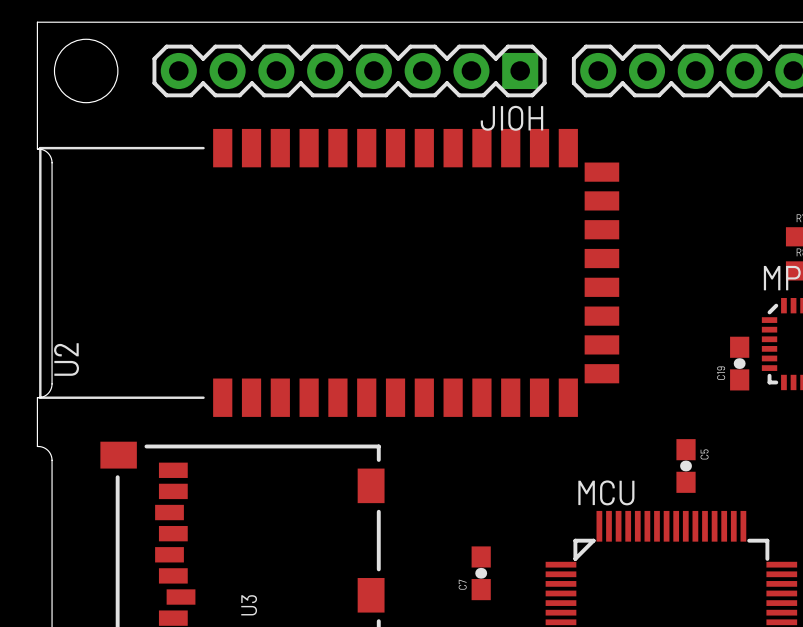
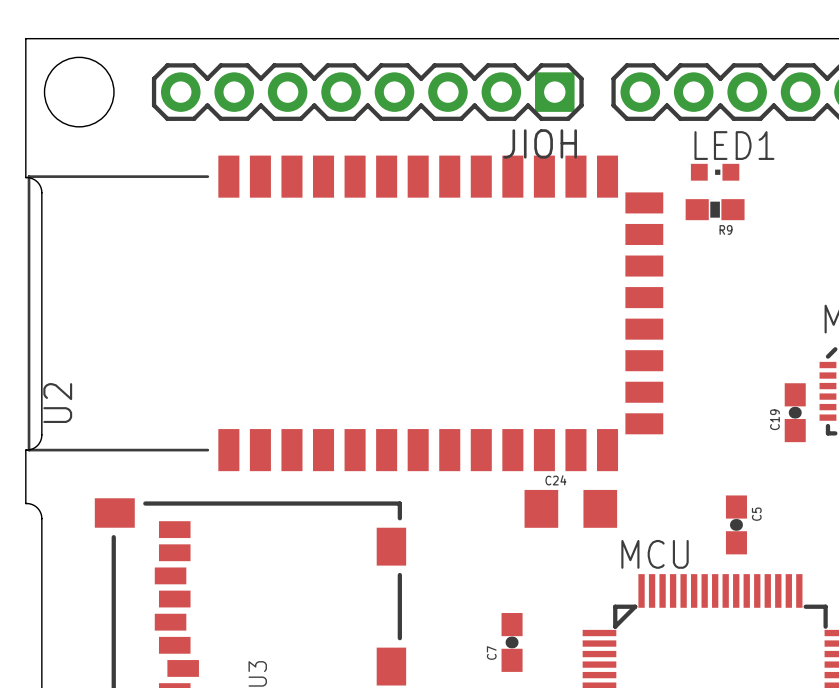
LED1: none -> (715, 172)
R9: none -> (715, 209)
C24: none -> (570, 508)

